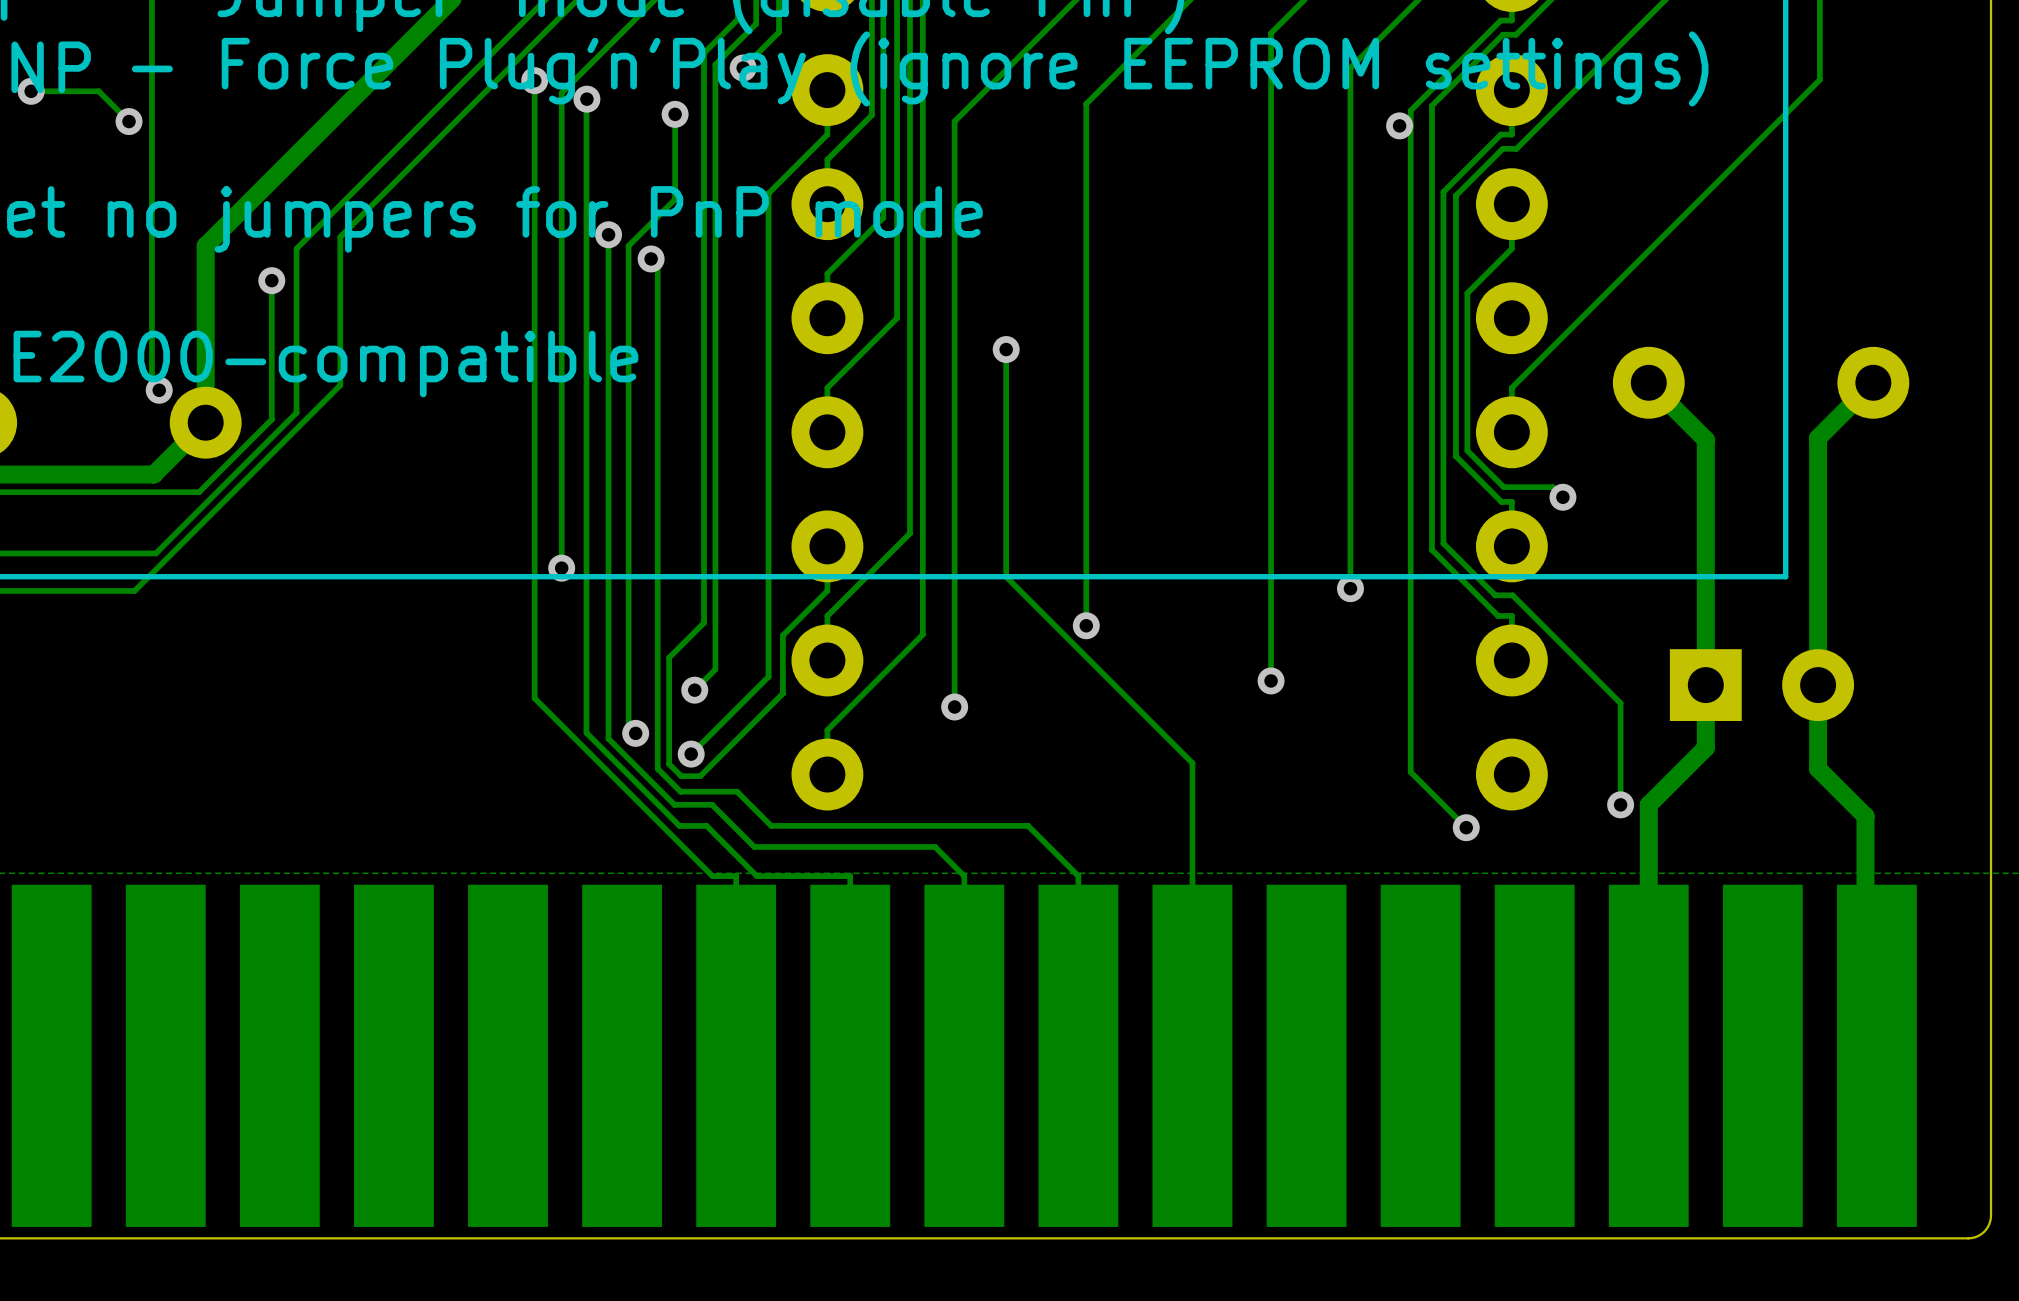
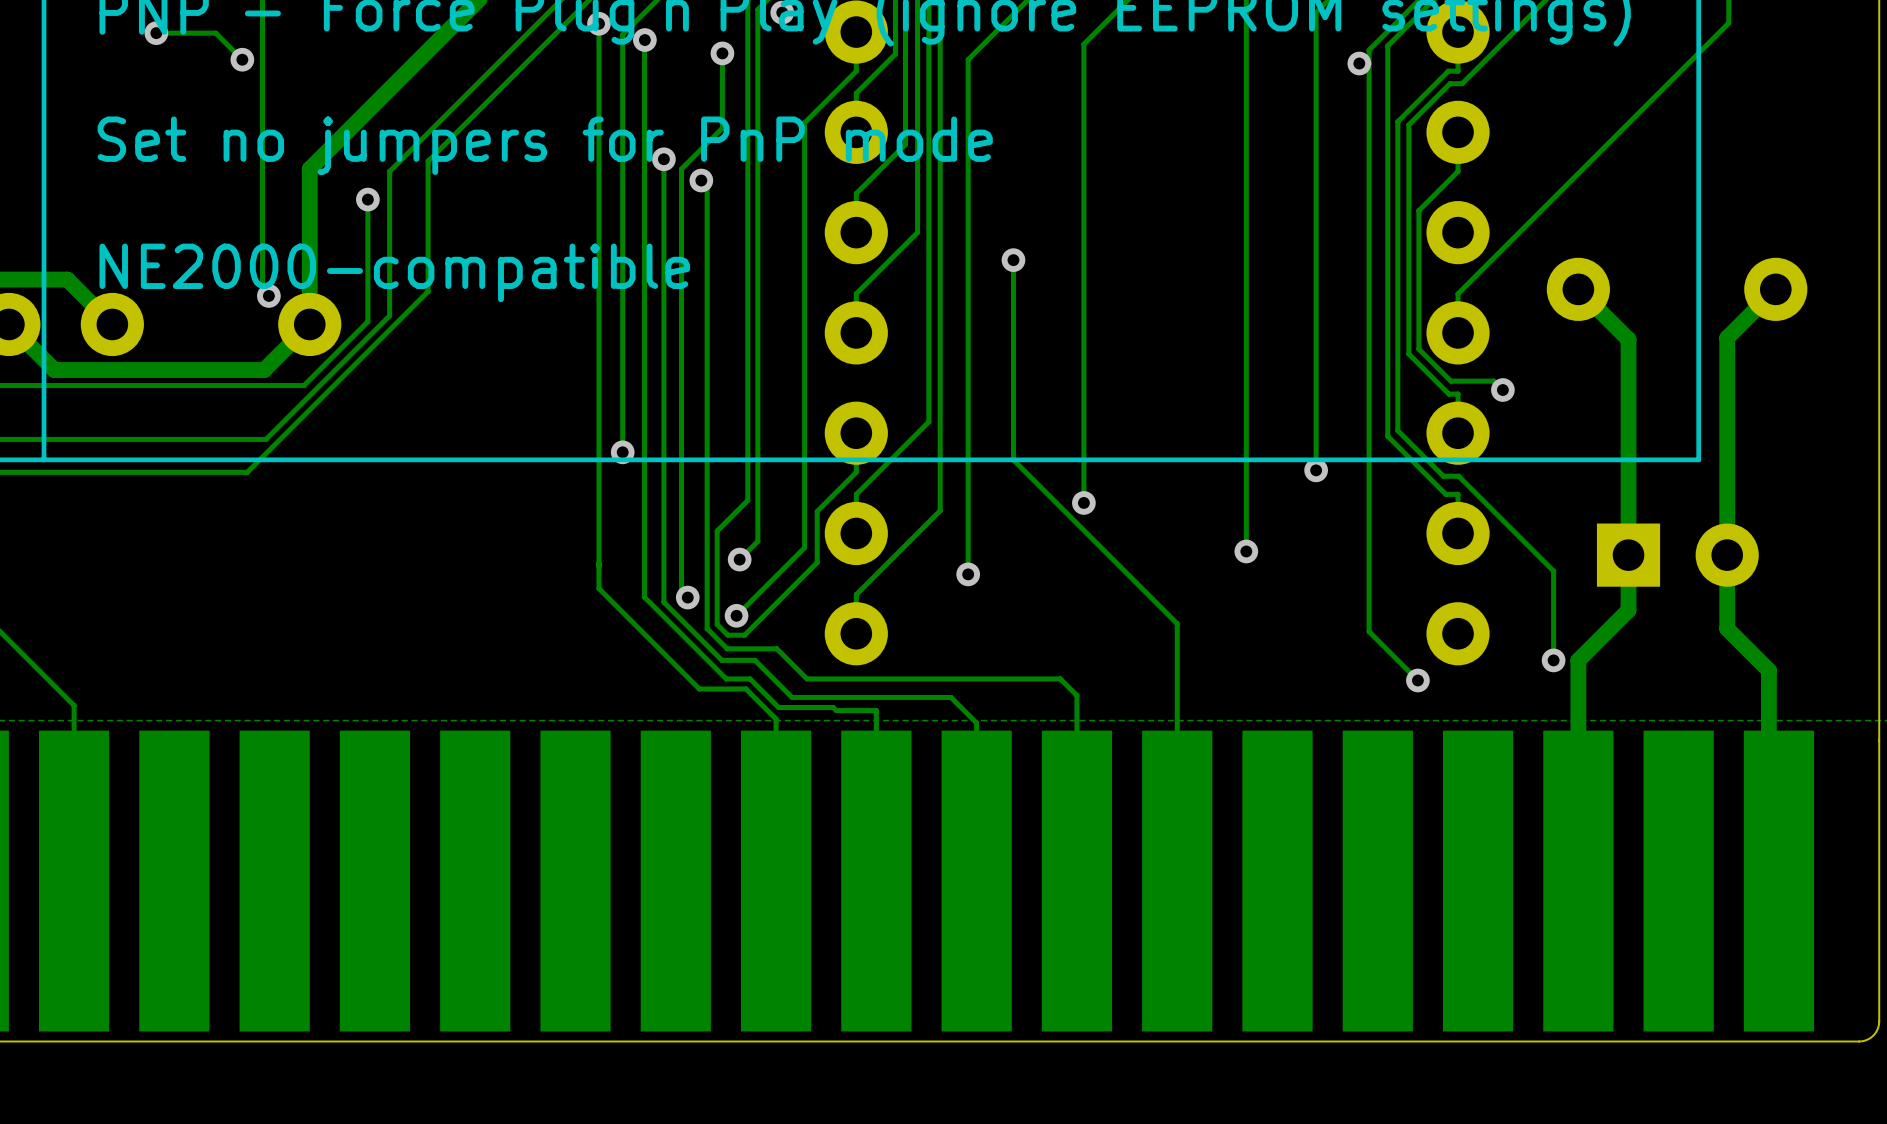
track: (534, 698) (712, 876) (736, 876) -> (598, 566) (598, 588) (699, 688) (746, 688) (776, 719) (776, 723)
track: (1028, 825) (1078, 876) -> (1032, 678) (1060, 678) (1076, 695) (1076, 723)
track: (739, 858) (756, 876) (850, 876) -> (778, 707) (833, 707) (836, 710) (876, 710) (876, 723)

